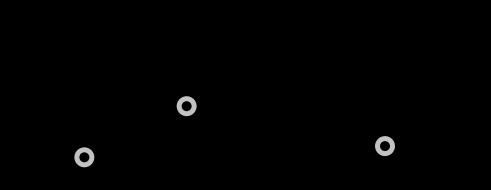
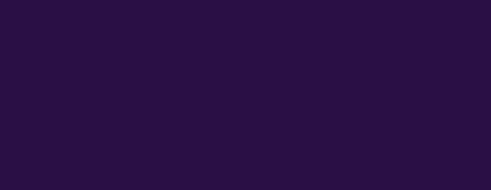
via: (186, 106) -> none
via: (384, 146) -> none
via: (84, 157) -> none

